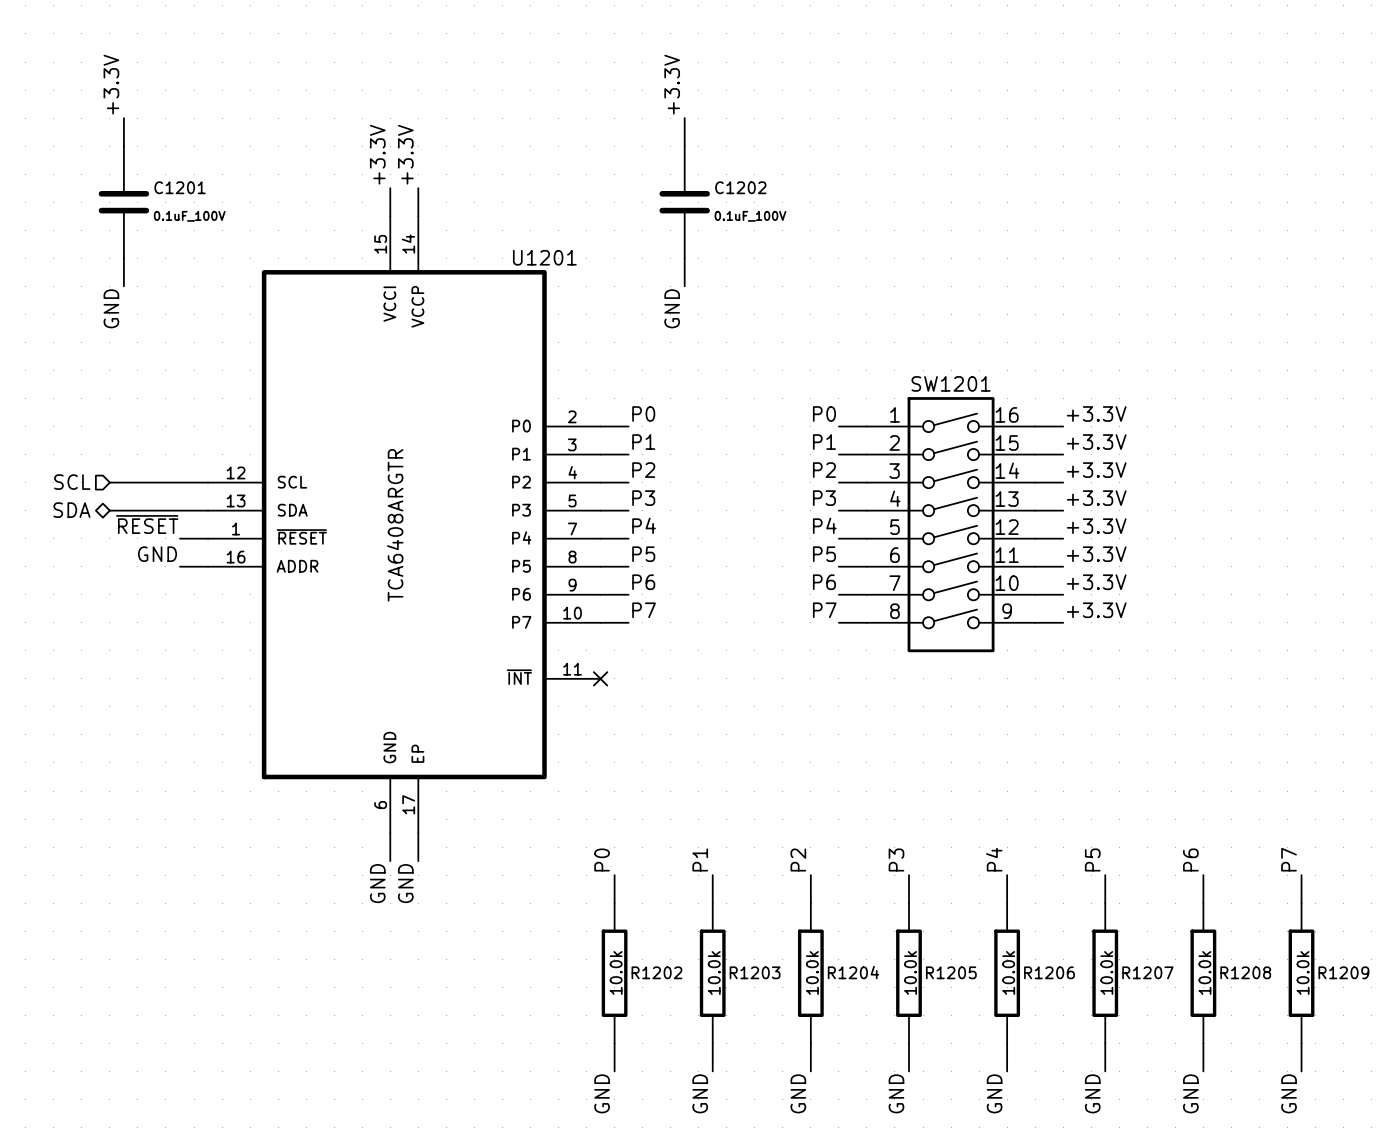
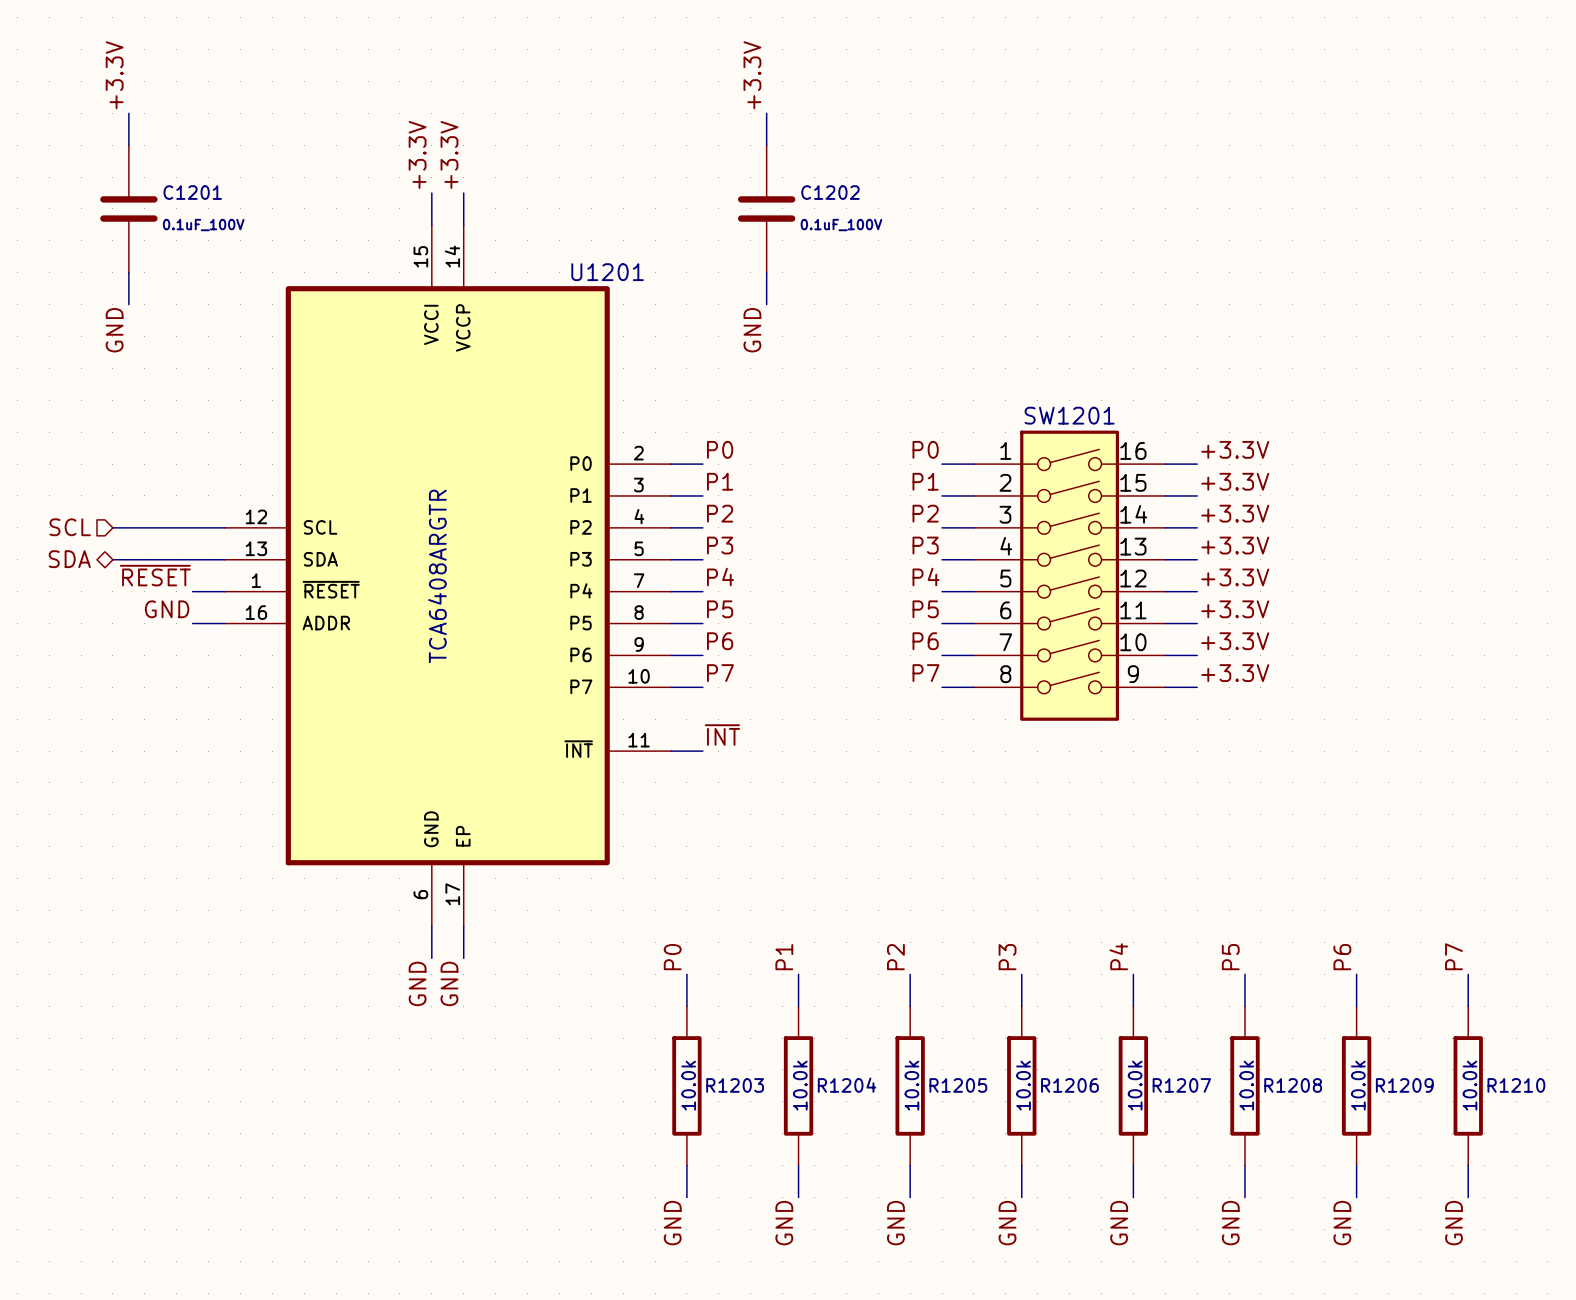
label: none -> ~{INT} (722, 735)
wire: none -> (670, 751) (702, 751)
no-connect mark: (600, 678) -> none
R1202 name: R1202 (656, 972) -> R1203 (735, 1085)
R1203 name: R1203 (755, 972) -> R1204 (847, 1085)
R1204 name: R1204 (853, 972) -> R1205 (958, 1085)
R1205 name: R1205 (951, 972) -> R1206 (1069, 1085)
R1206 name: R1206 (1049, 972) -> R1207 (1181, 1085)
R1207 name: R1207 (1147, 972) -> R1208 (1293, 1085)
R1208 name: R1208 (1245, 972) -> R1209 (1404, 1085)
R1209 name: R1209 (1343, 972) -> R1210 (1516, 1085)

